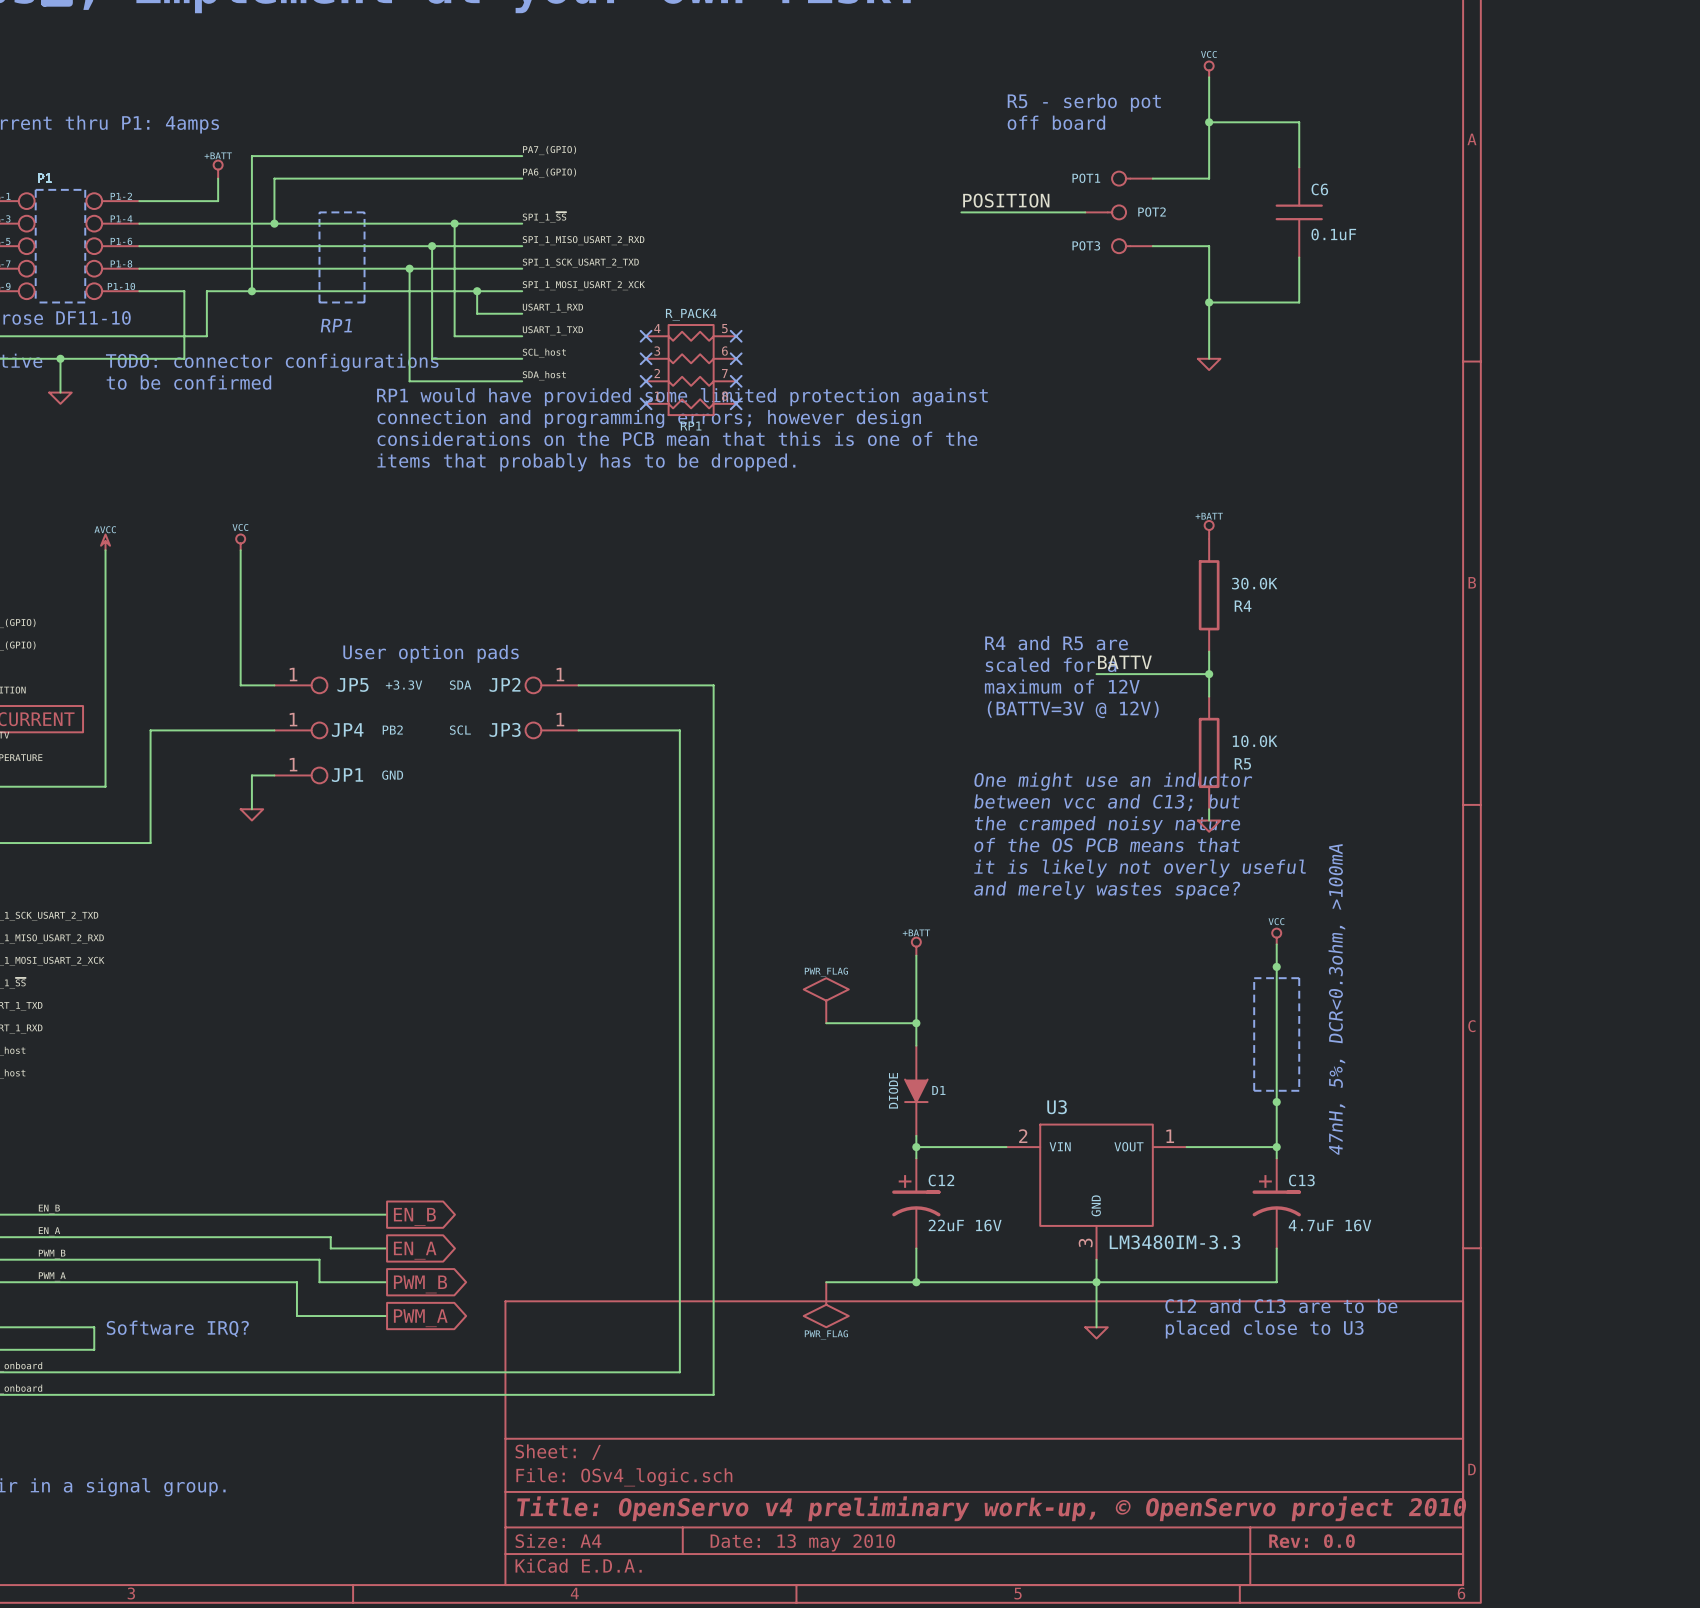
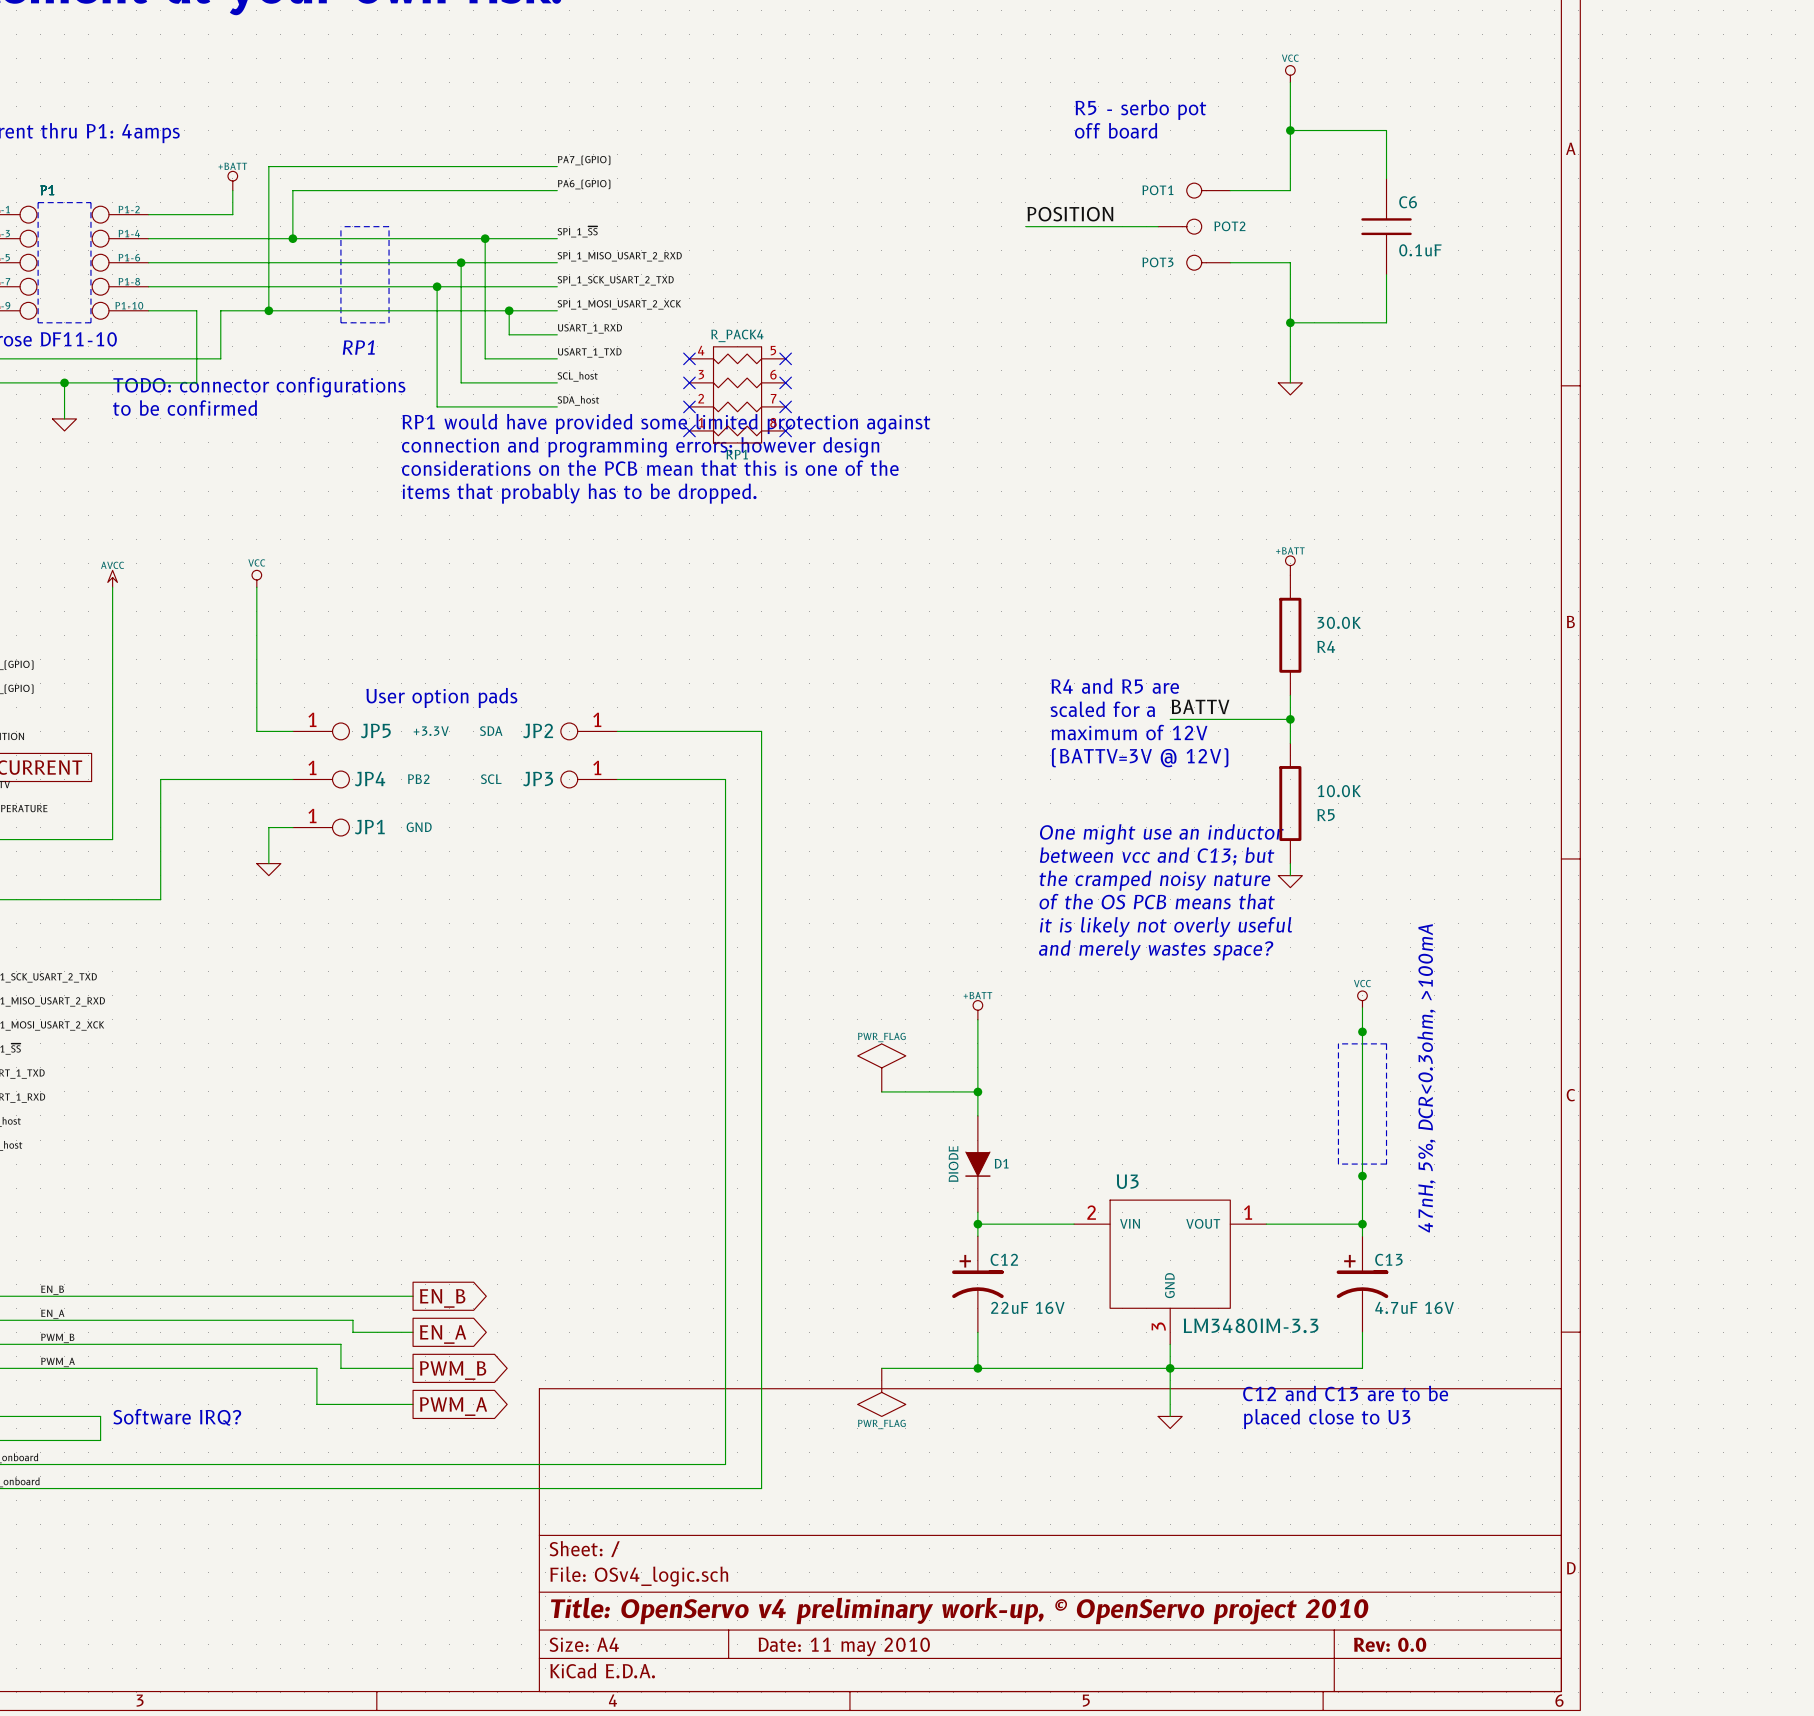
title block: Date: 13 may 2010 (802, 1542) -> Date: 11 may 2010 (844, 1646)

